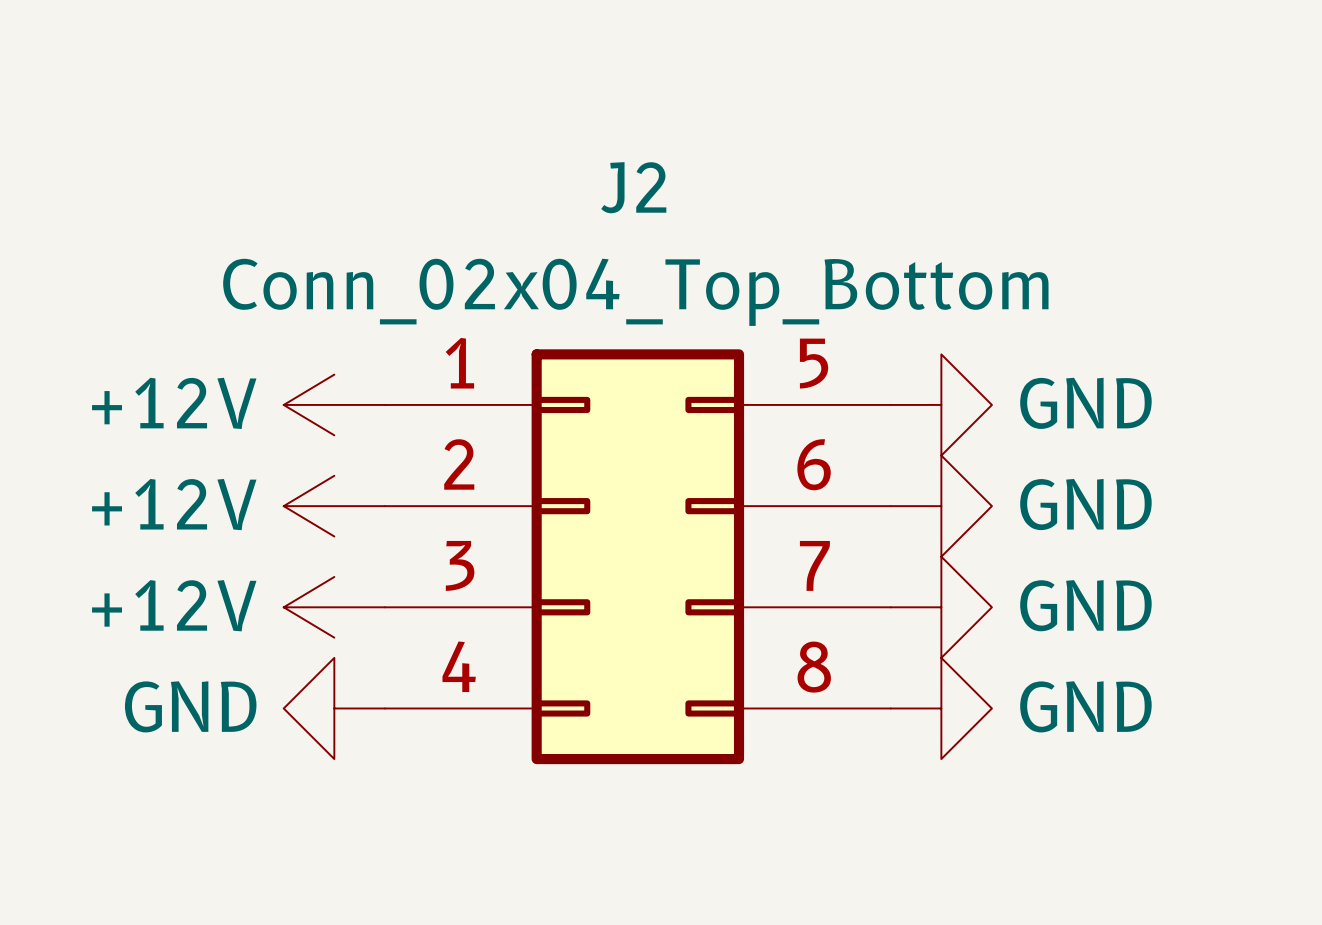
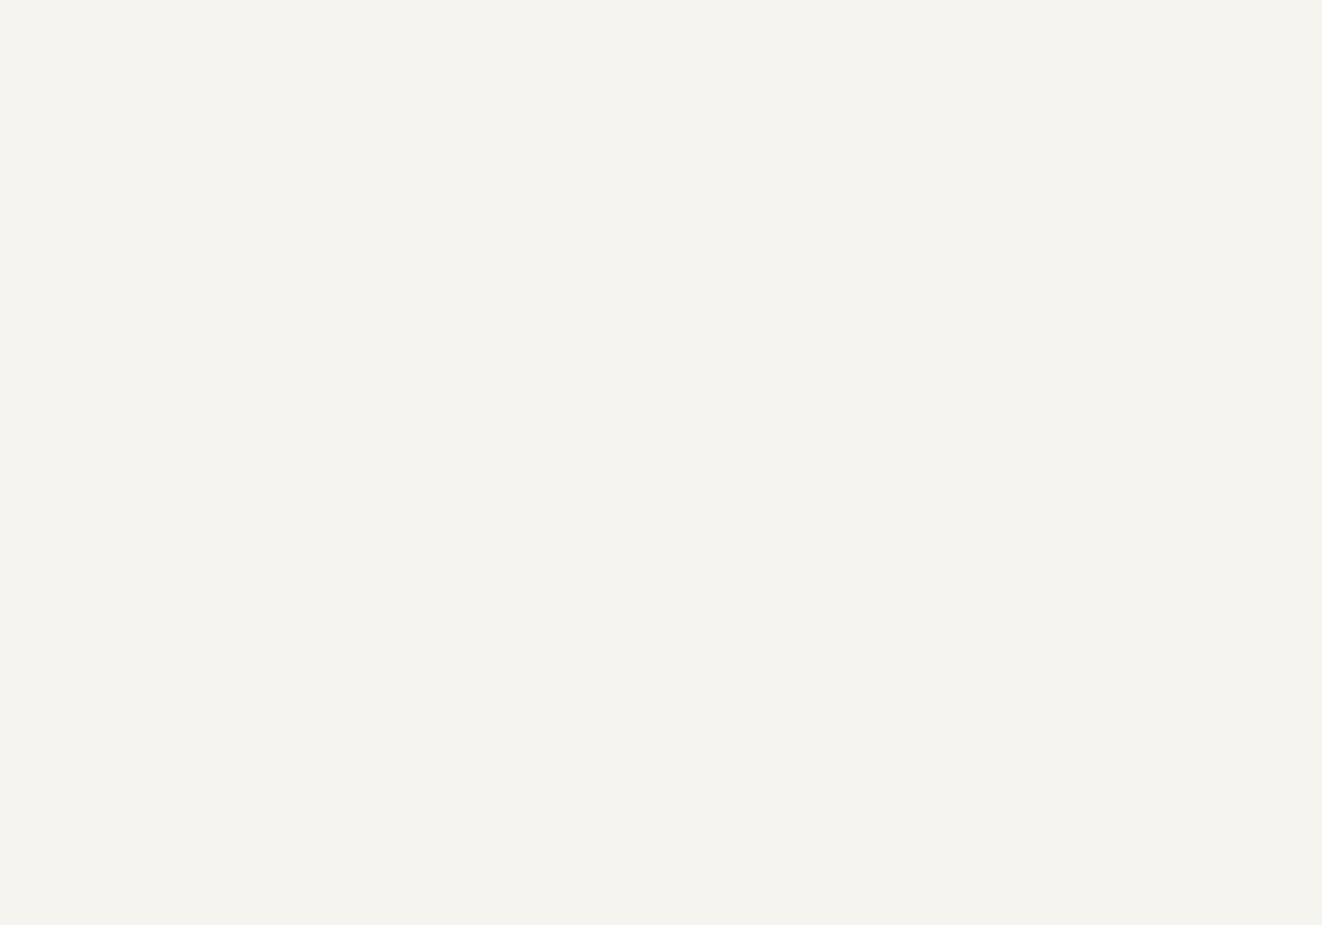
power symbol: +12V (334, 404) -> none
power symbol: GND (941, 404) -> none
power symbol: +12V (334, 506) -> none
power symbol: GND (941, 506) -> none
J2: Conn_02x04_Top_Bottom (637, 556) -> none
power symbol: +12V (334, 607) -> none
power symbol: GND (941, 607) -> none
power symbol: GND (334, 708) -> none
power symbol: GND (941, 708) -> none

